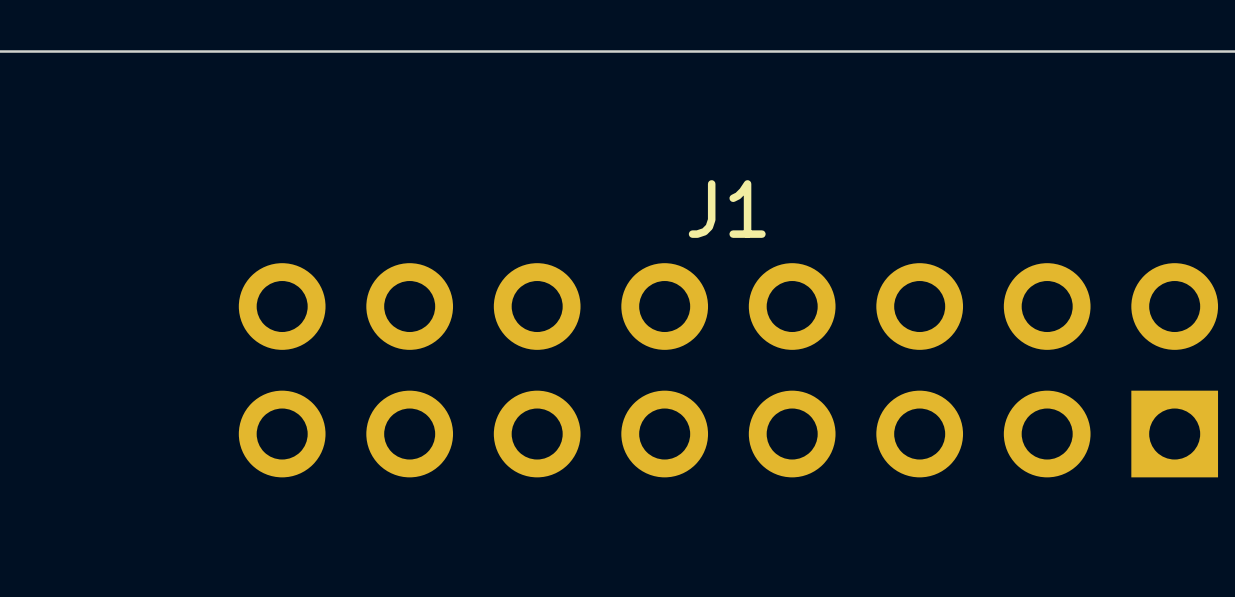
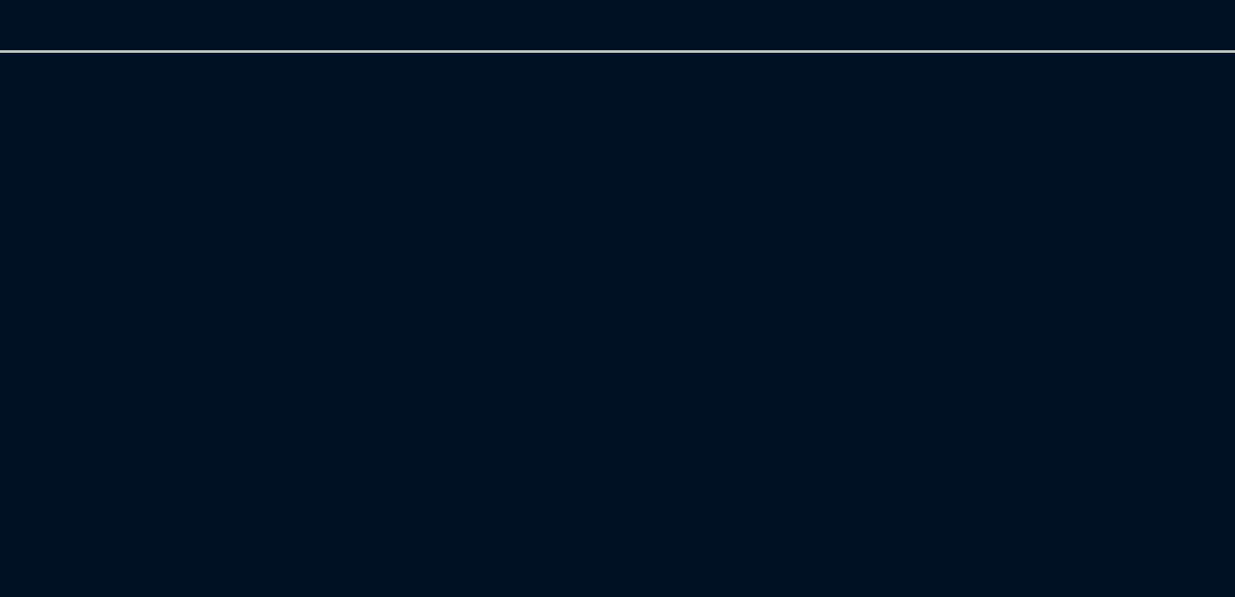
J1: (728, 370) -> none

